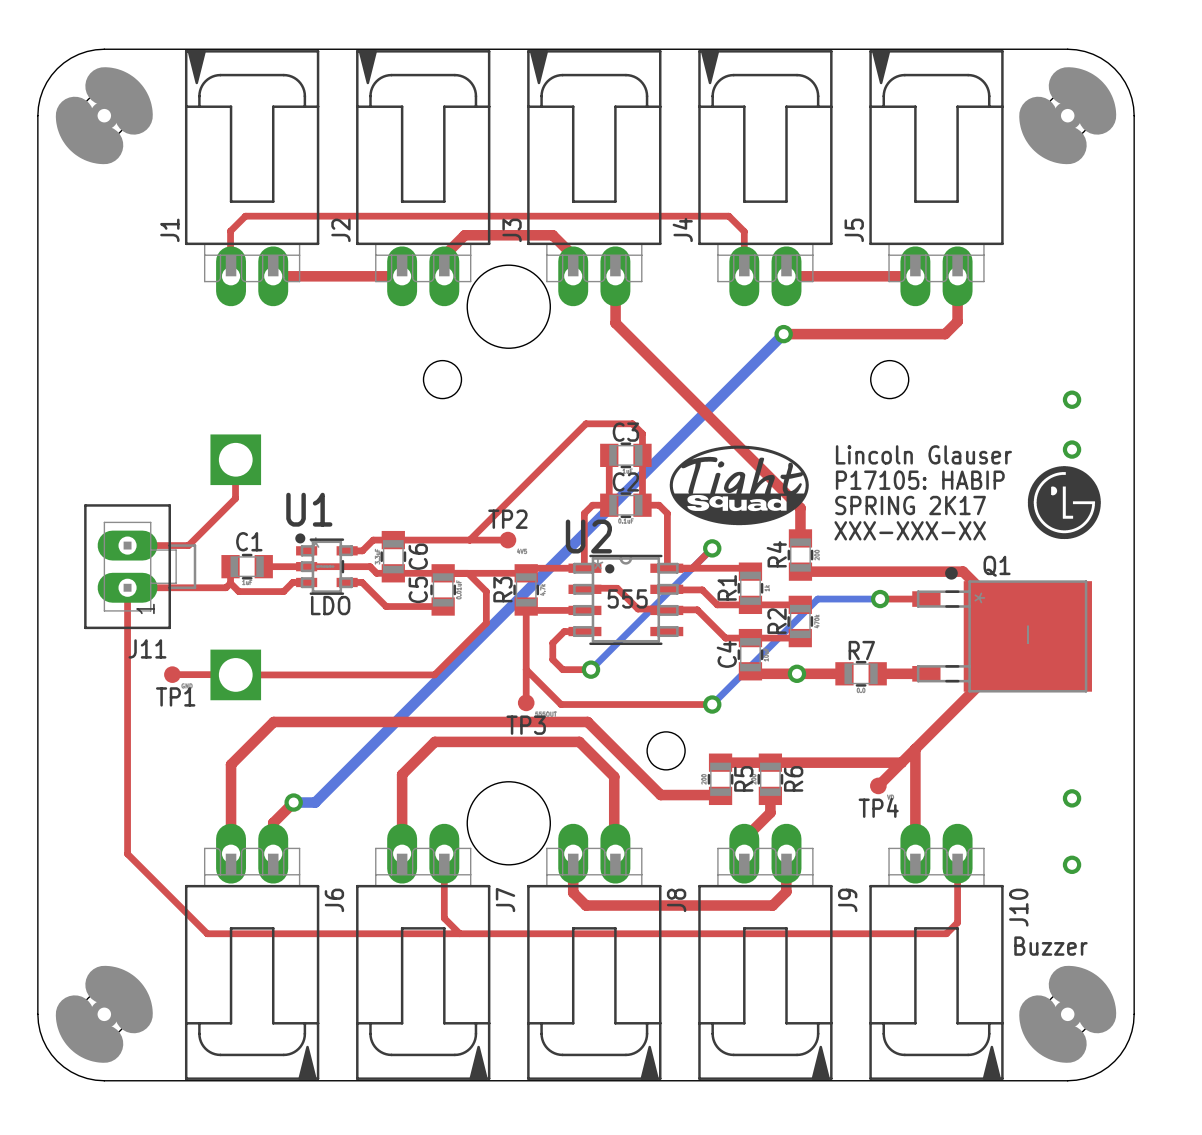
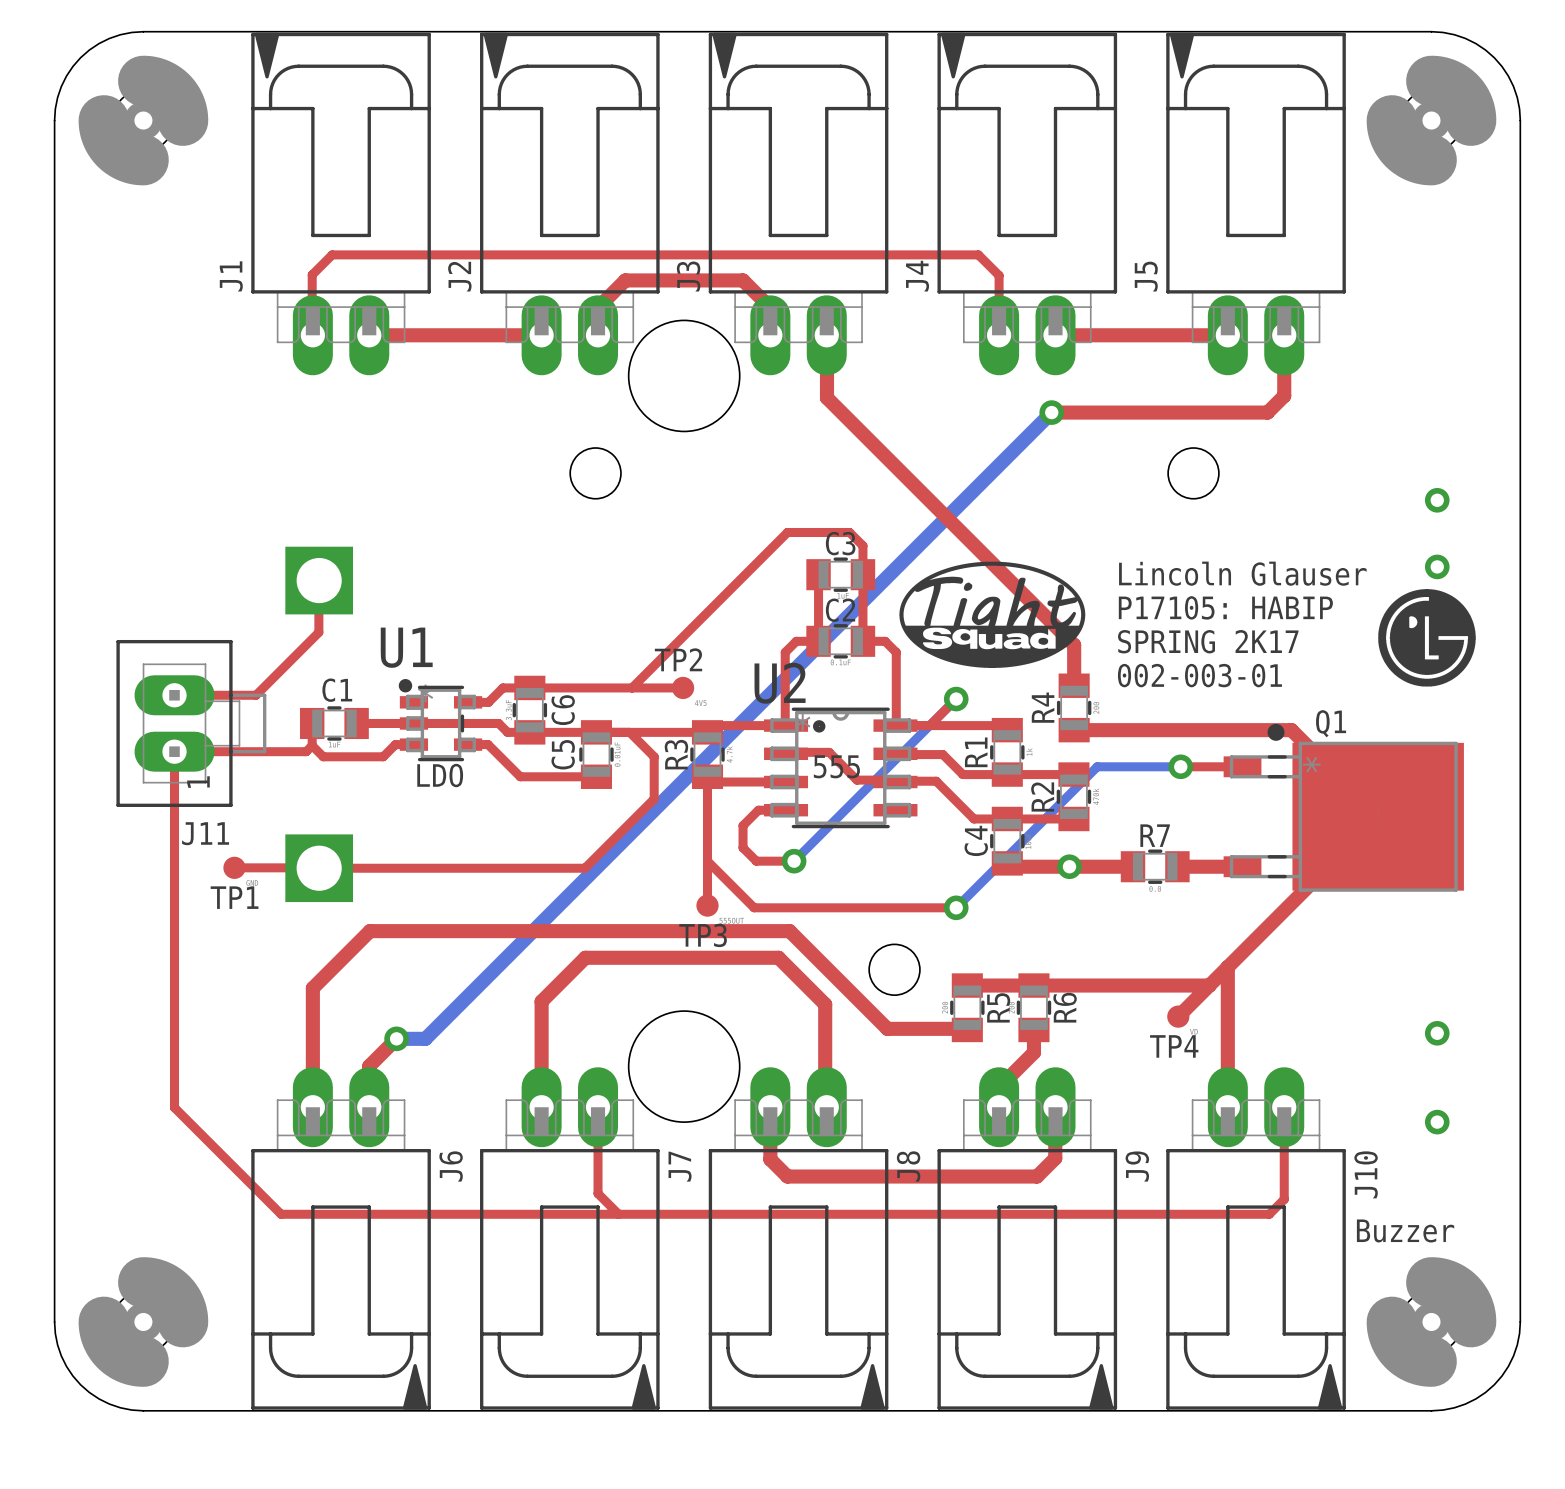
text: XXX-XXX-XX (910, 530) -> 002-003-01 (1199, 675)

